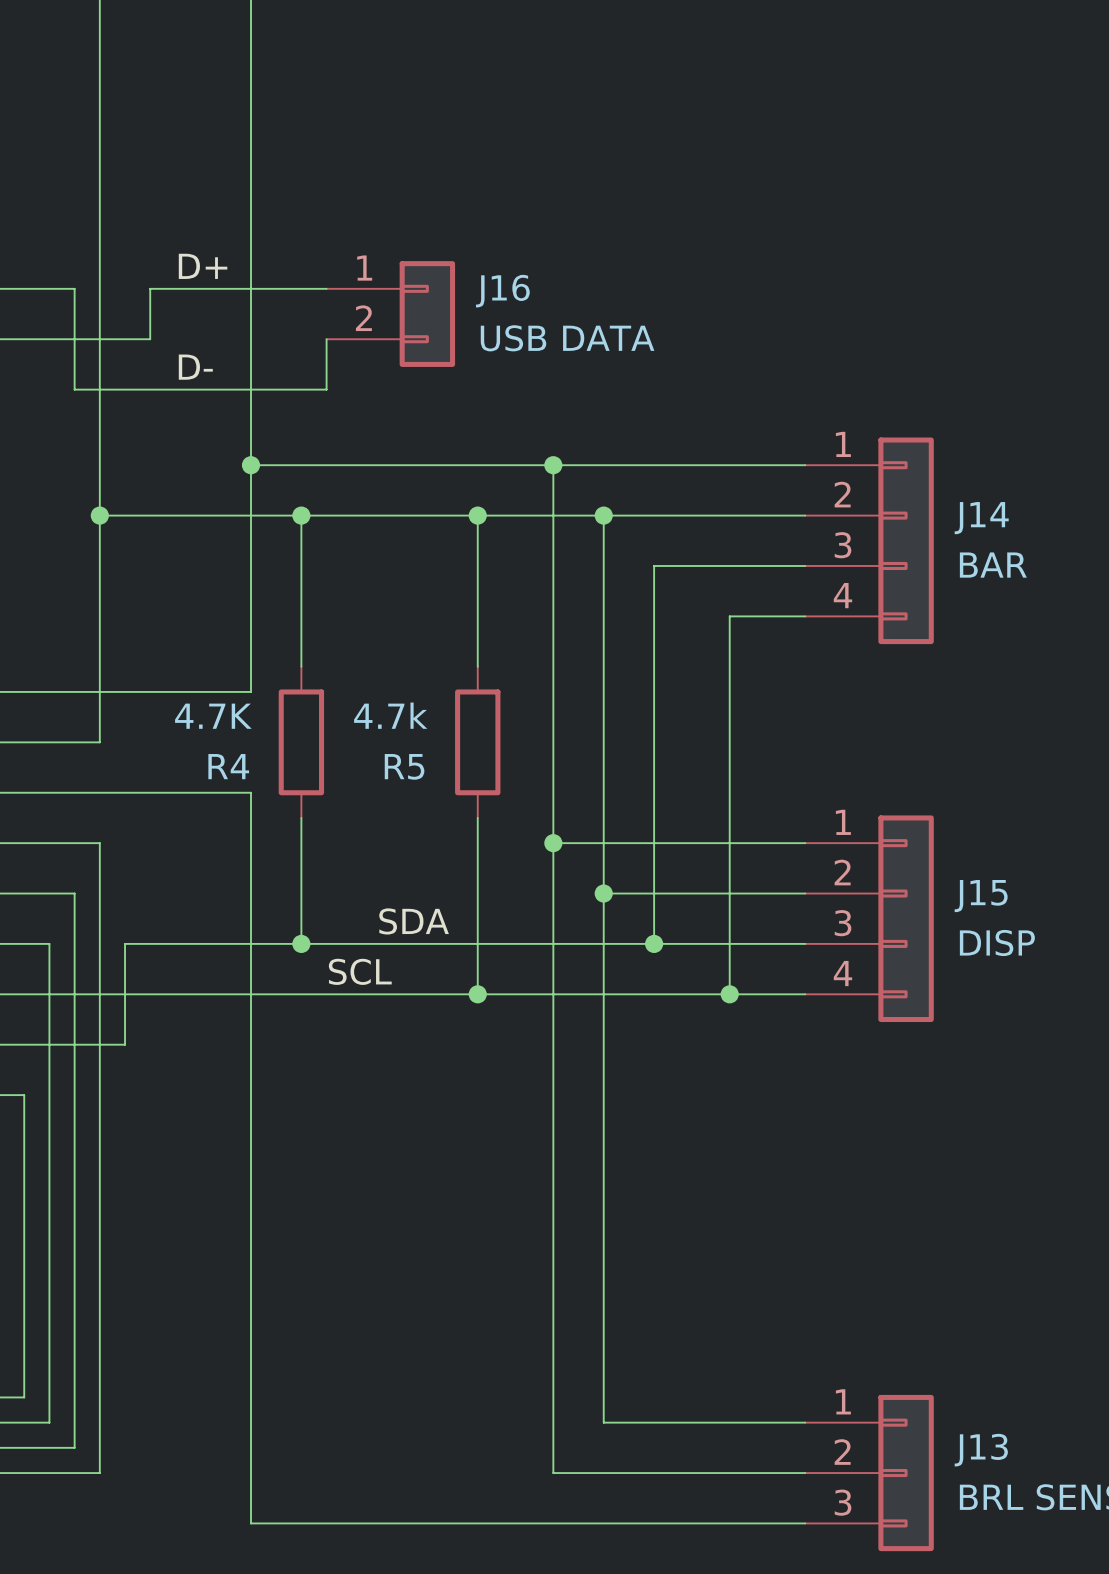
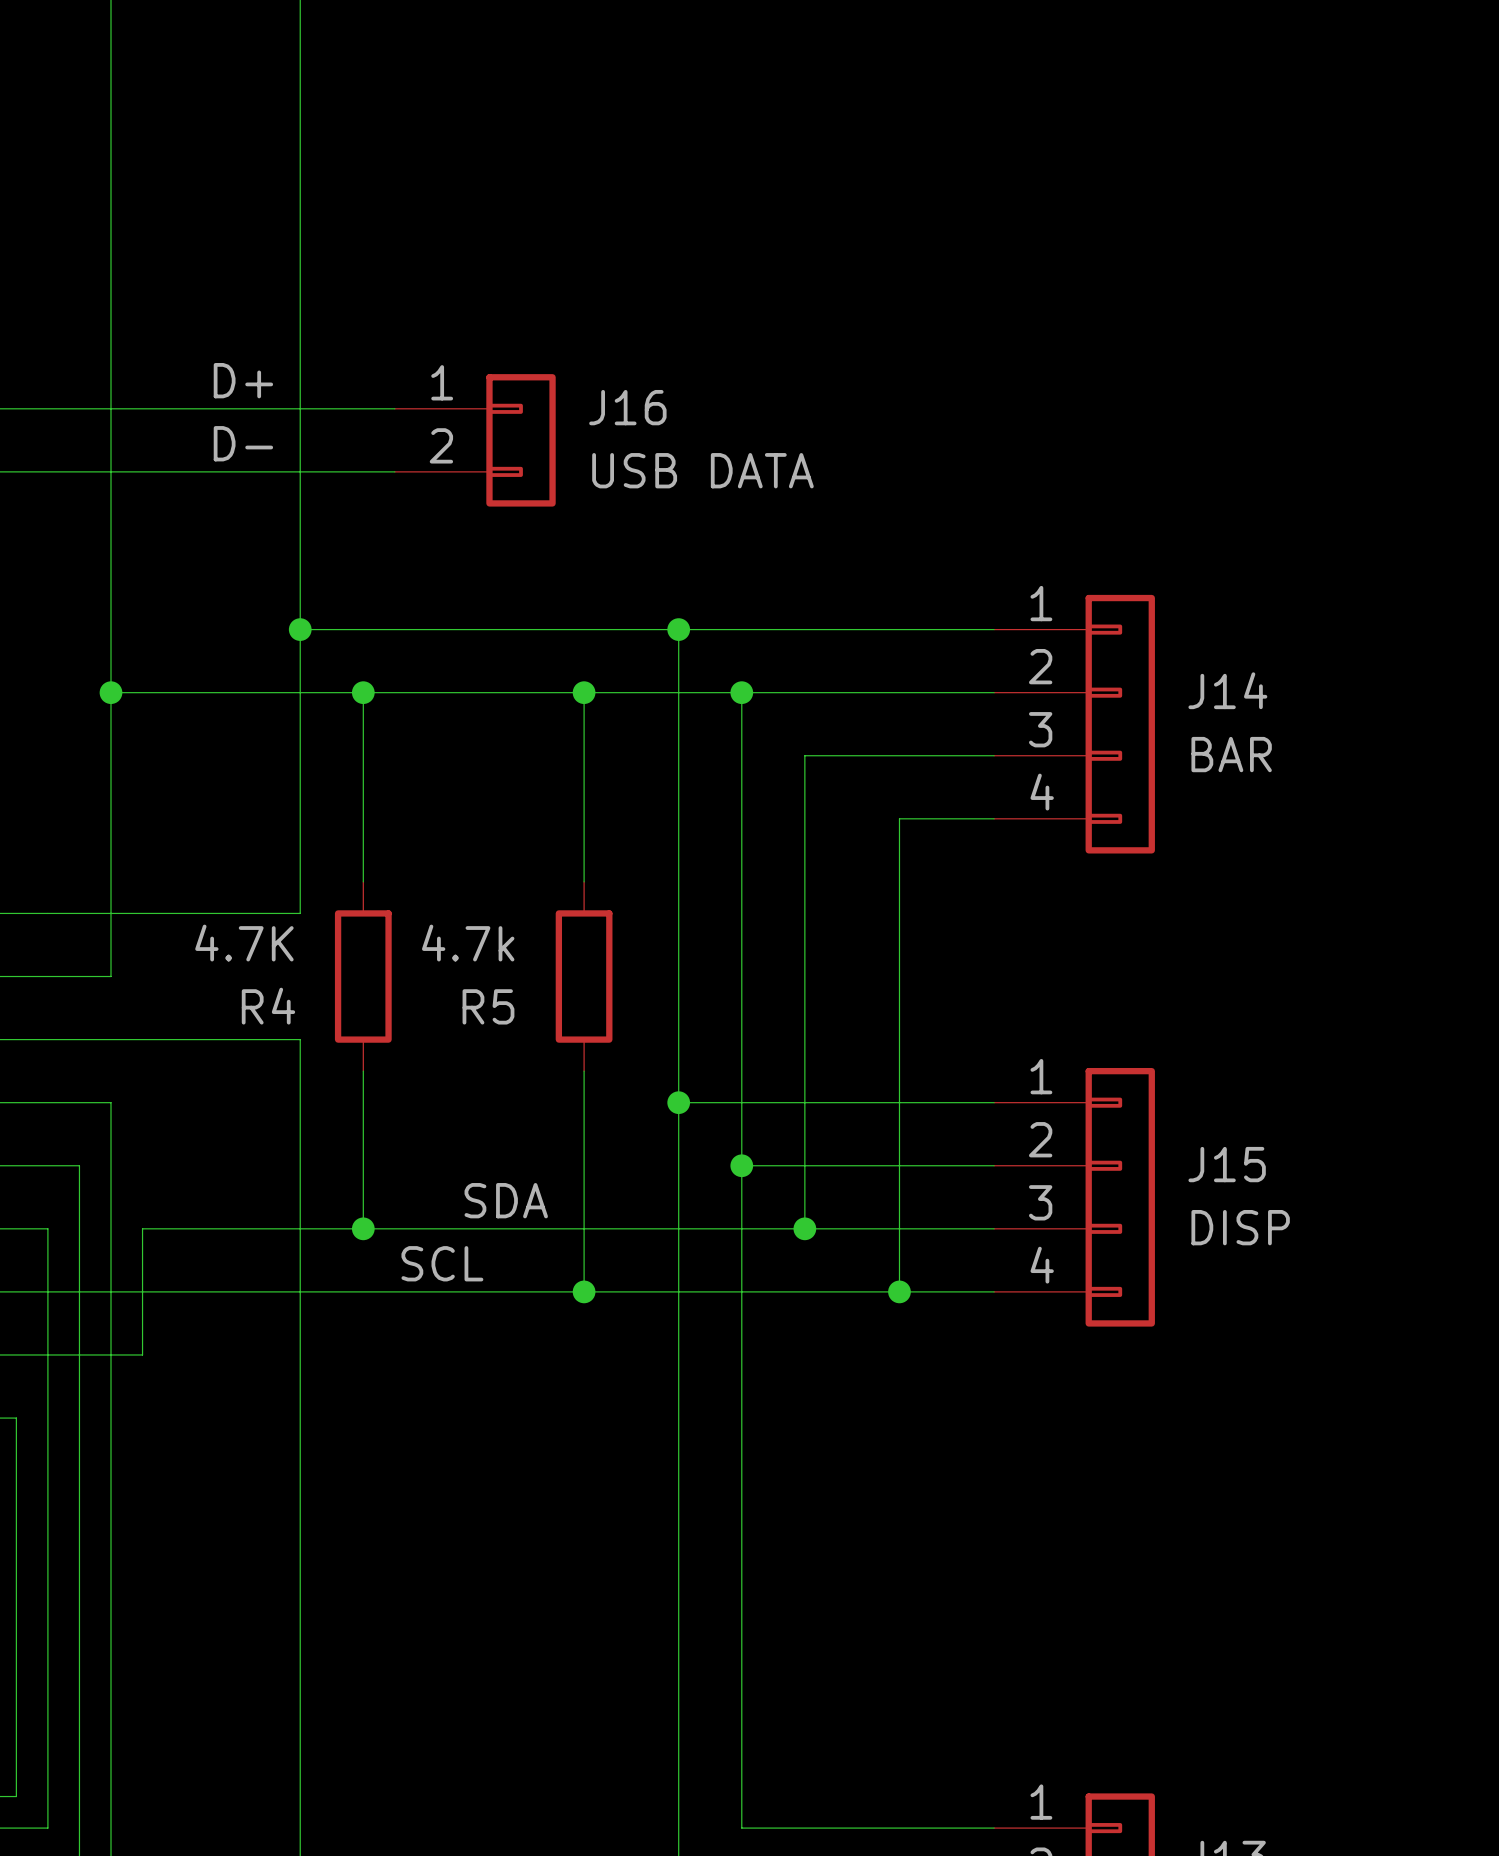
wire: (74, 288) (74, 389) (326, 389) (326, 339) -> (174, 471) (394, 471)
wire: (150, 288) (150, 339) -> (174, 408) (79, 408)
label position: D- (195, 367) -> D- (243, 443)

